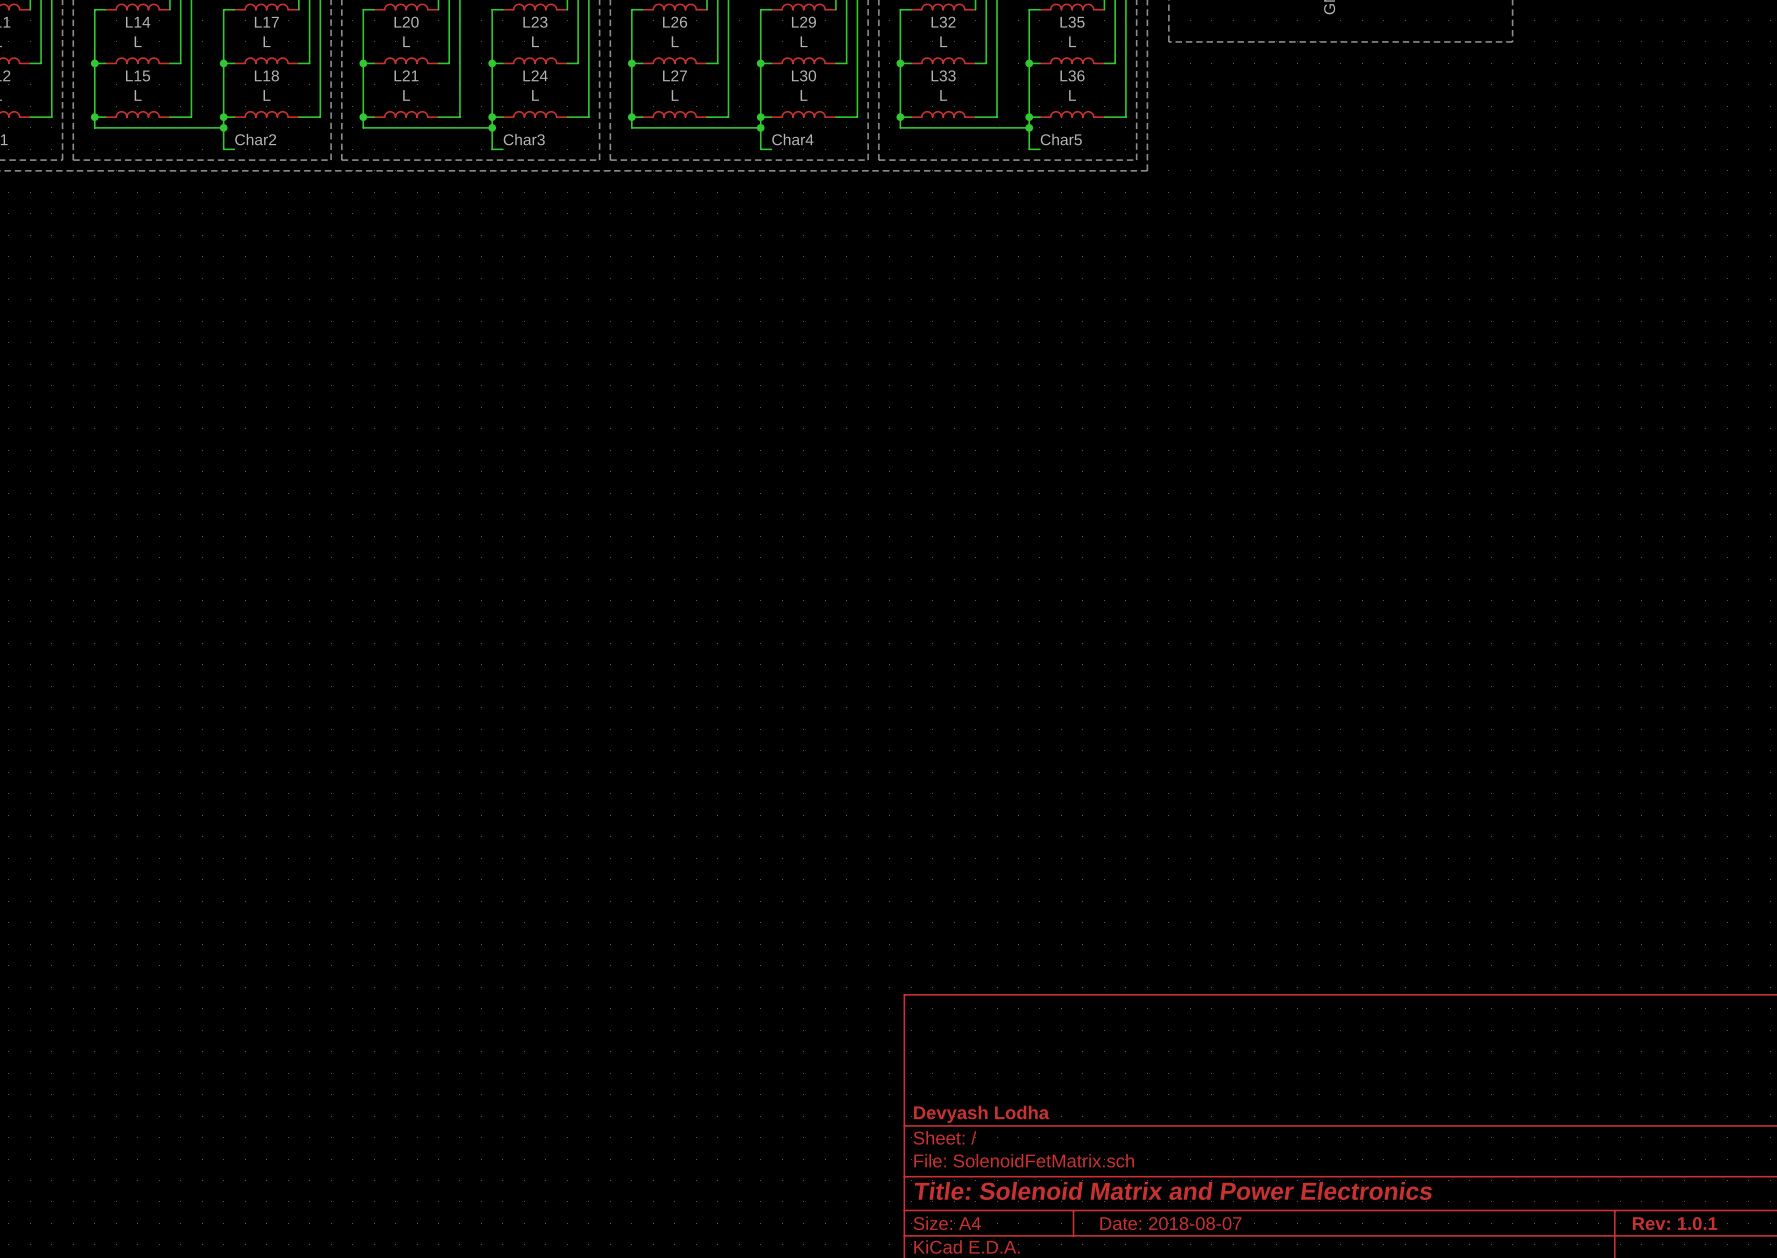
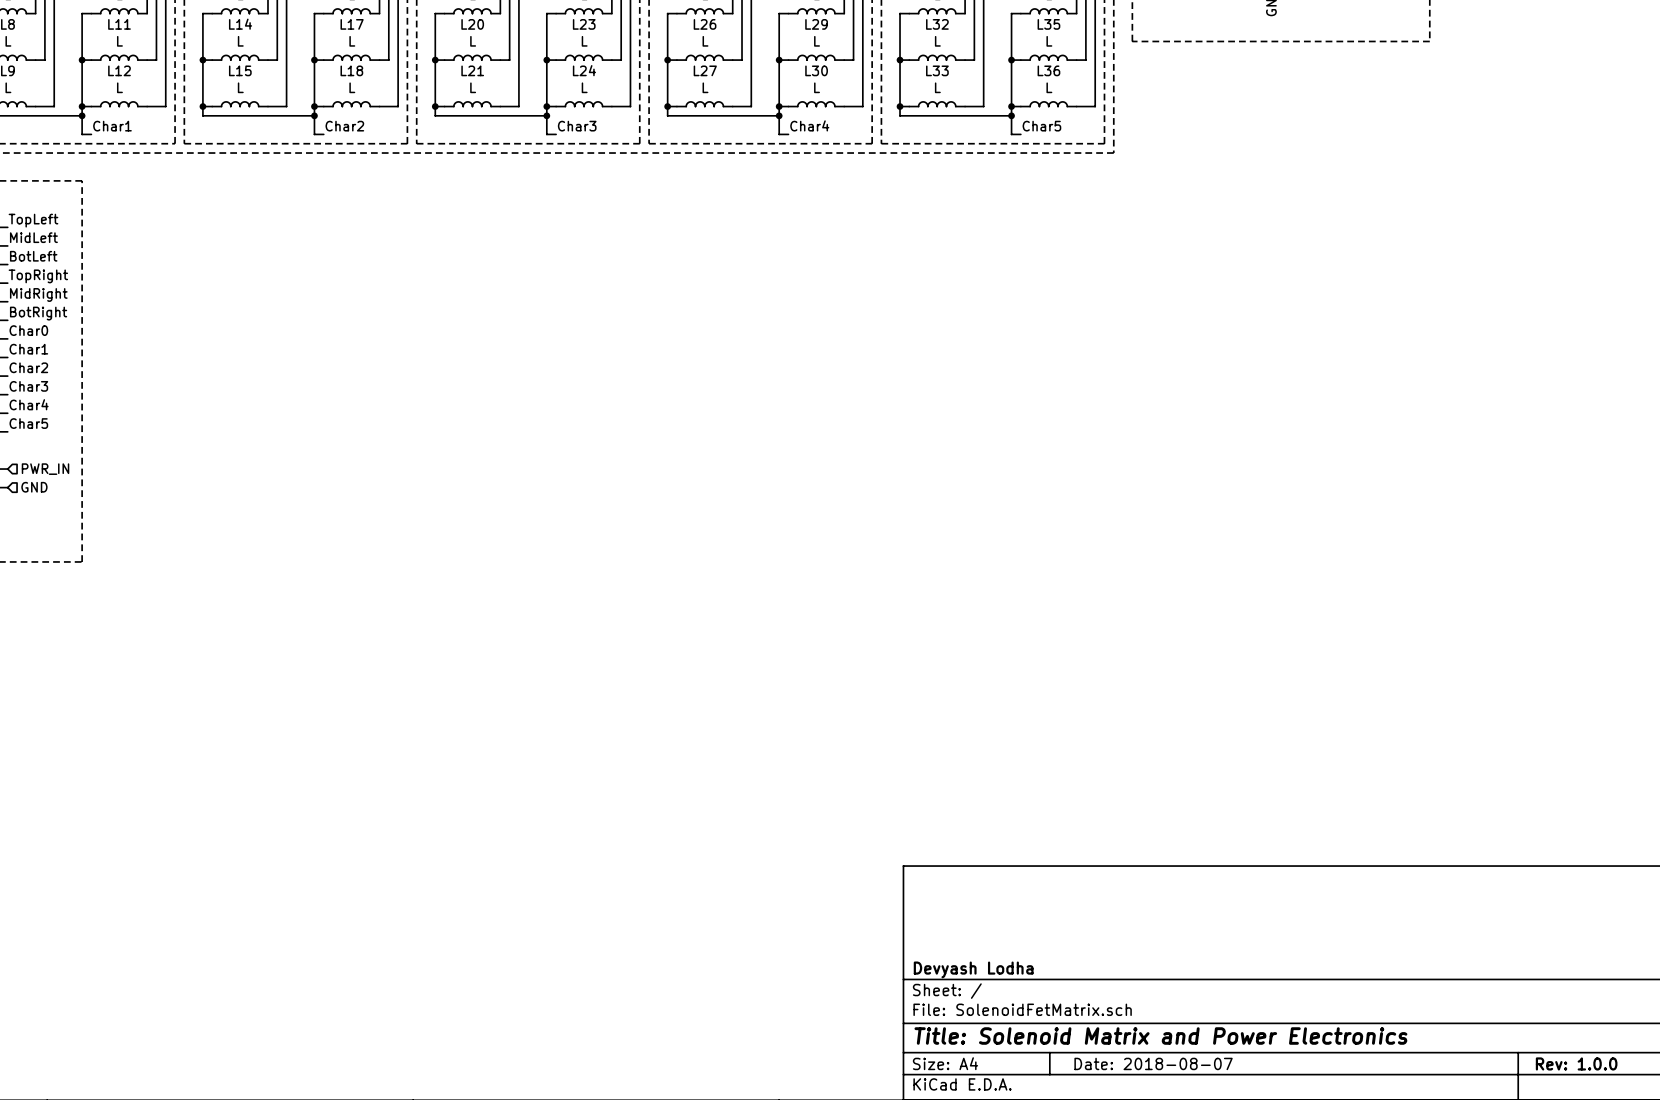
title block: Rev: 1.0.1 (1675, 1223) -> Rev: 1.0.0 (1576, 1063)

